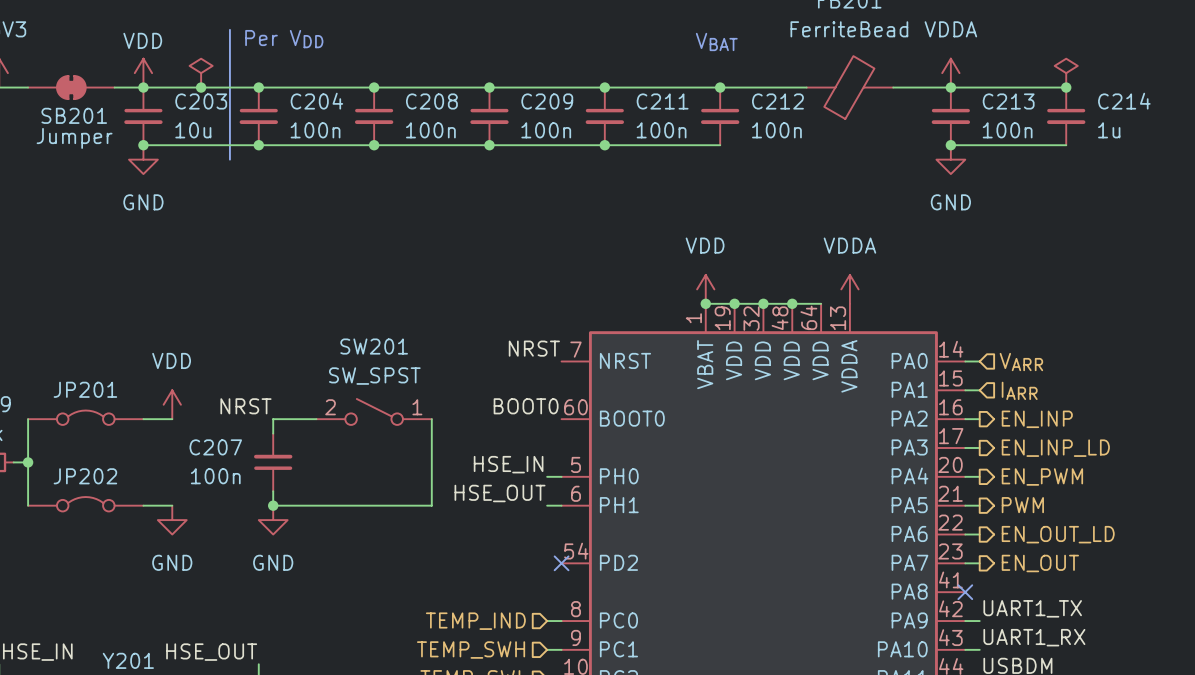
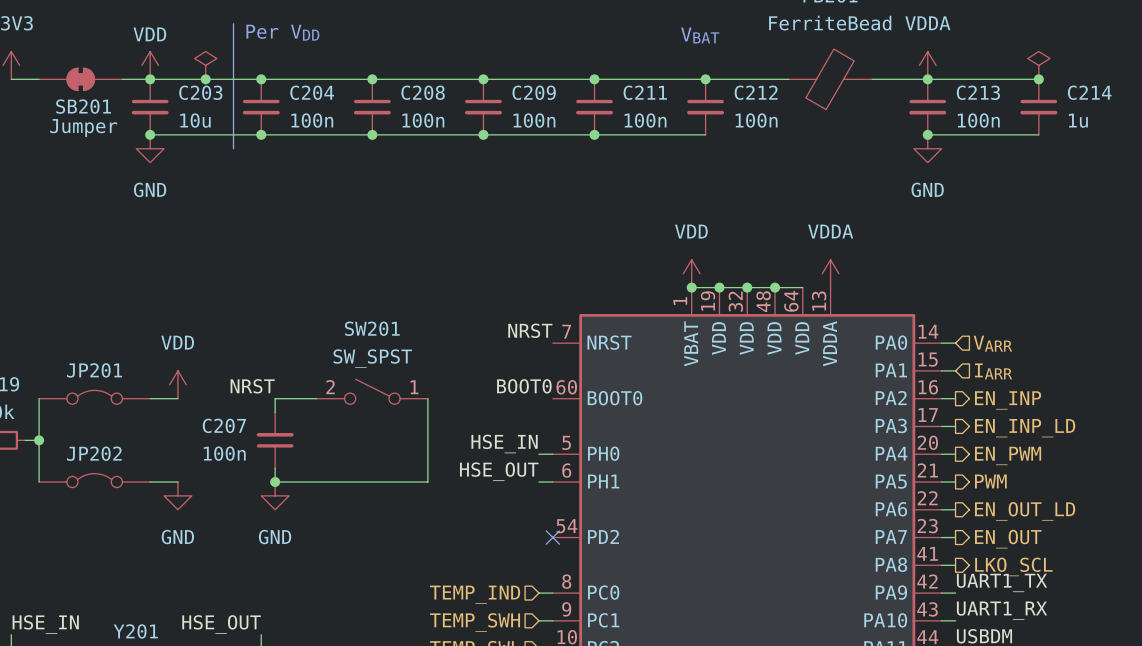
wire: none -> (941, 565) (955, 565)
no-connect mark: (965, 592) -> none
hierarchical label: none -> LKO_SCL (1013, 566)

